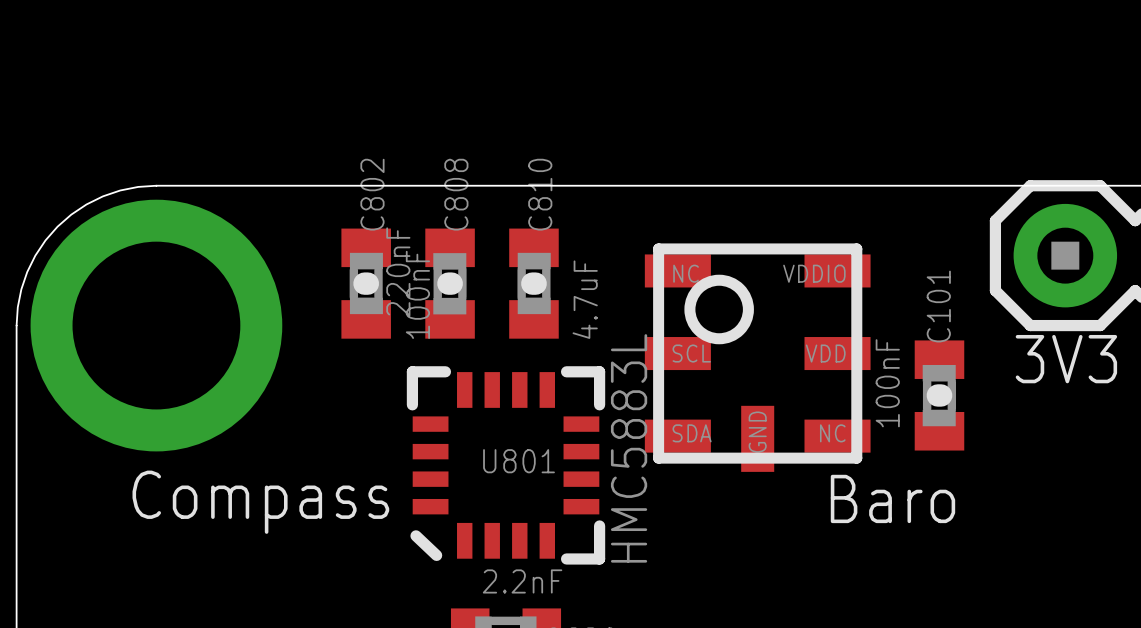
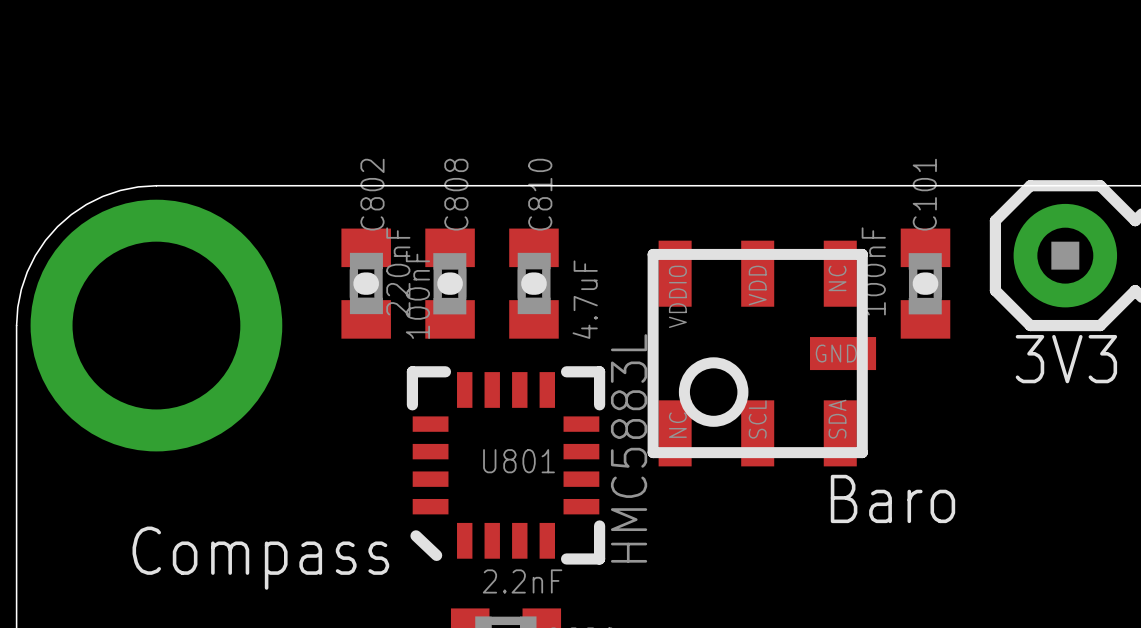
part footprint: [644, 243, 871, 472] -> [647, 240, 877, 467]
C101 position: (939, 395) -> (925, 283)
text position: Compass (260, 502) -> Compass (260, 558)

